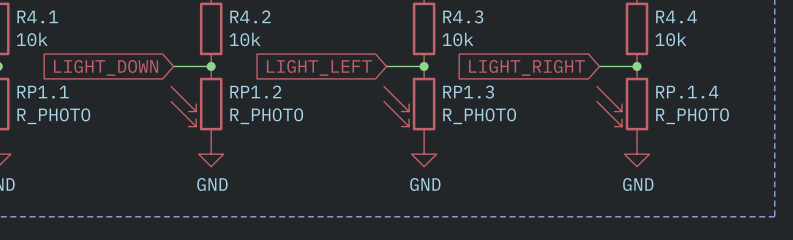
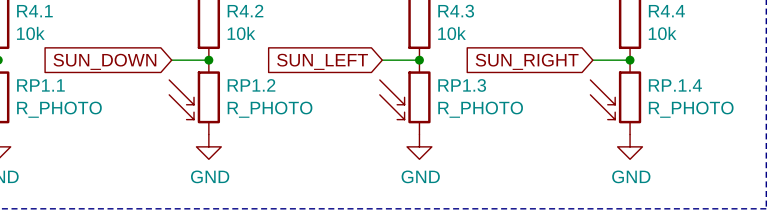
global label: LIGHT_DOWN (106, 67) -> SUN_DOWN (104, 61)
global label: LIGHT_LEFT (319, 67) -> SUN_LEFT (322, 61)
global label: LIGHT_RIGHT (526, 67) -> SUN_RIGHT (527, 61)

